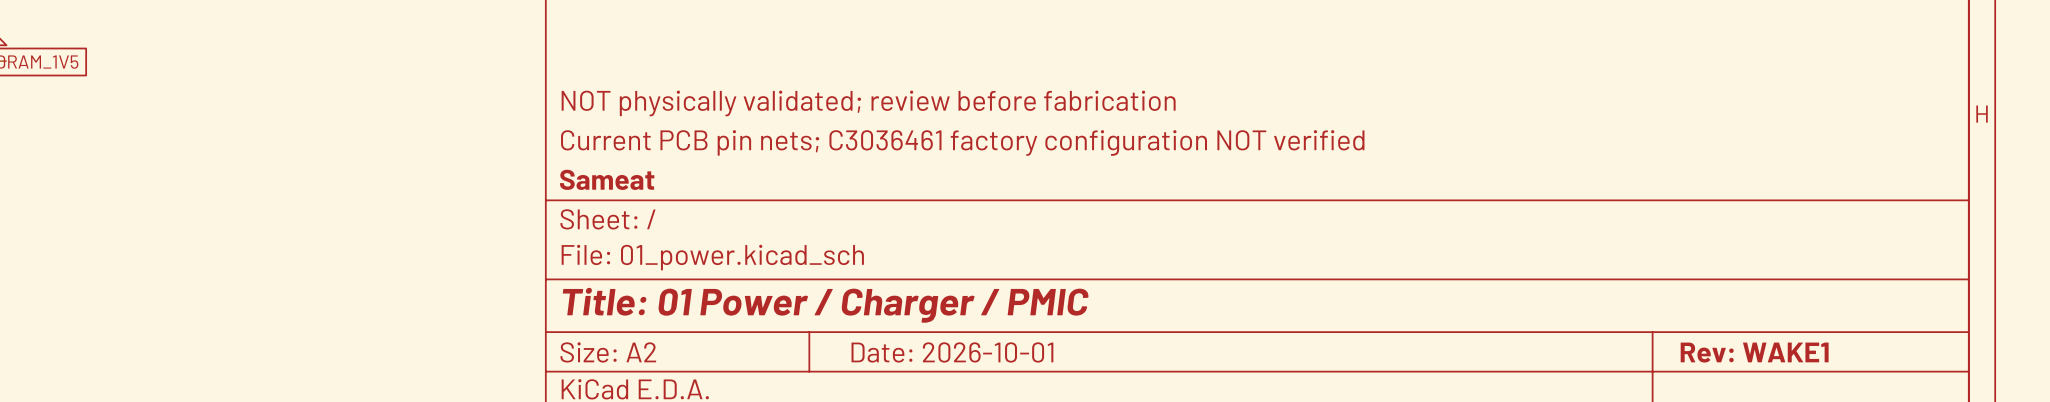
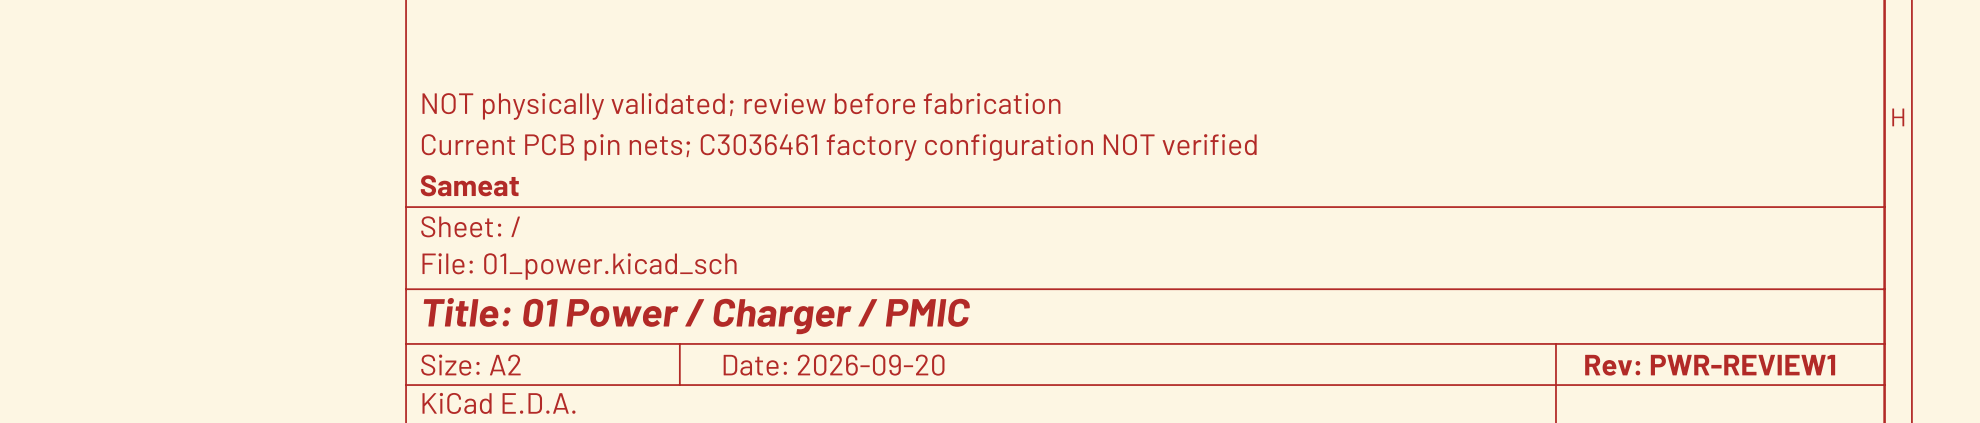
title block: Date: 2026-10-01 (952, 352) -> Date: 2026-09-20 (834, 365)
title block: Rev: WAKE1 (1754, 352) -> Rev: PWR-REVIEW1 (1710, 365)

